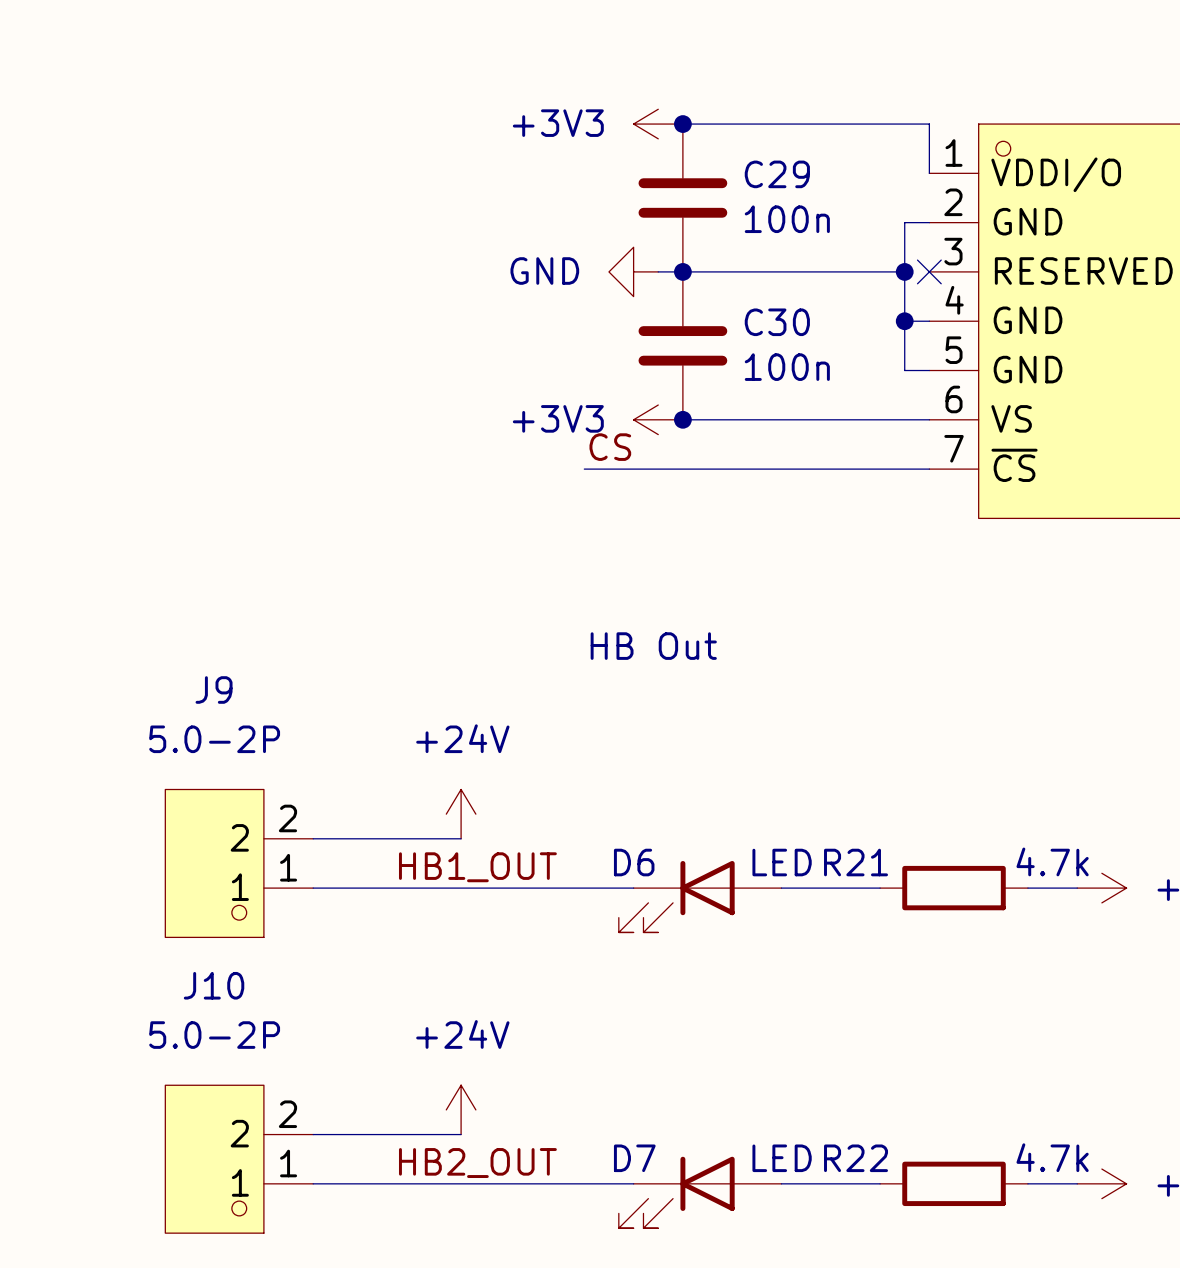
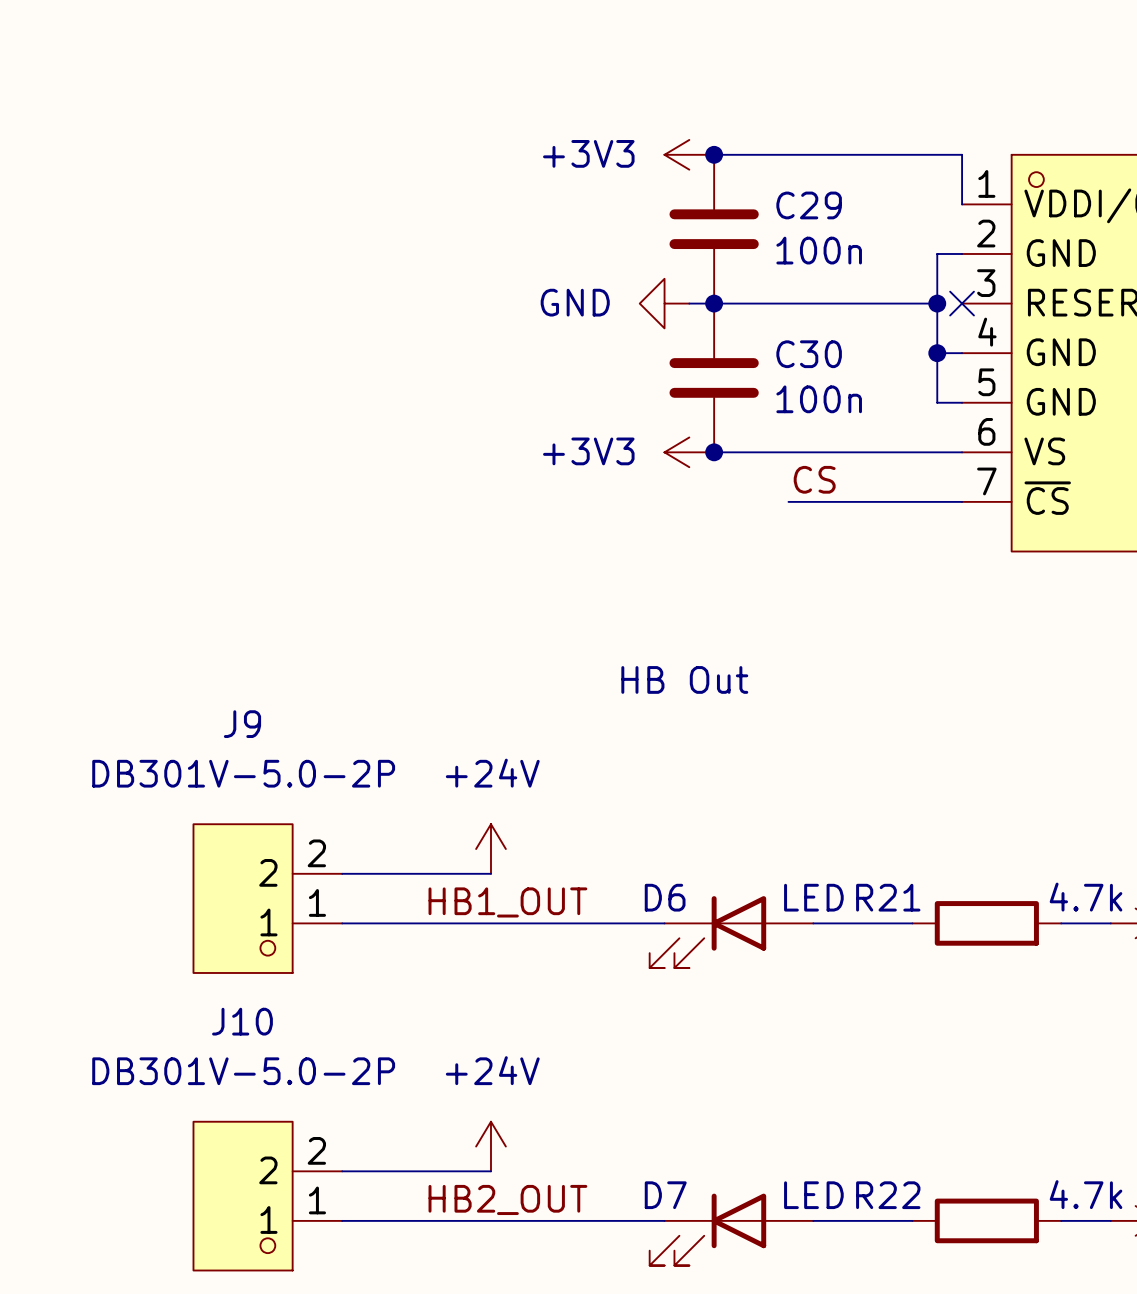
label position: CS (610, 447) -> CS (814, 479)
wire: (584, 469) (756, 469) -> none
J9 value: 5.0-2P (214, 739) -> DB301V-5.0-2P (243, 773)
J10 value: 5.0-2P (214, 1035) -> DB301V-5.0-2P (243, 1071)

